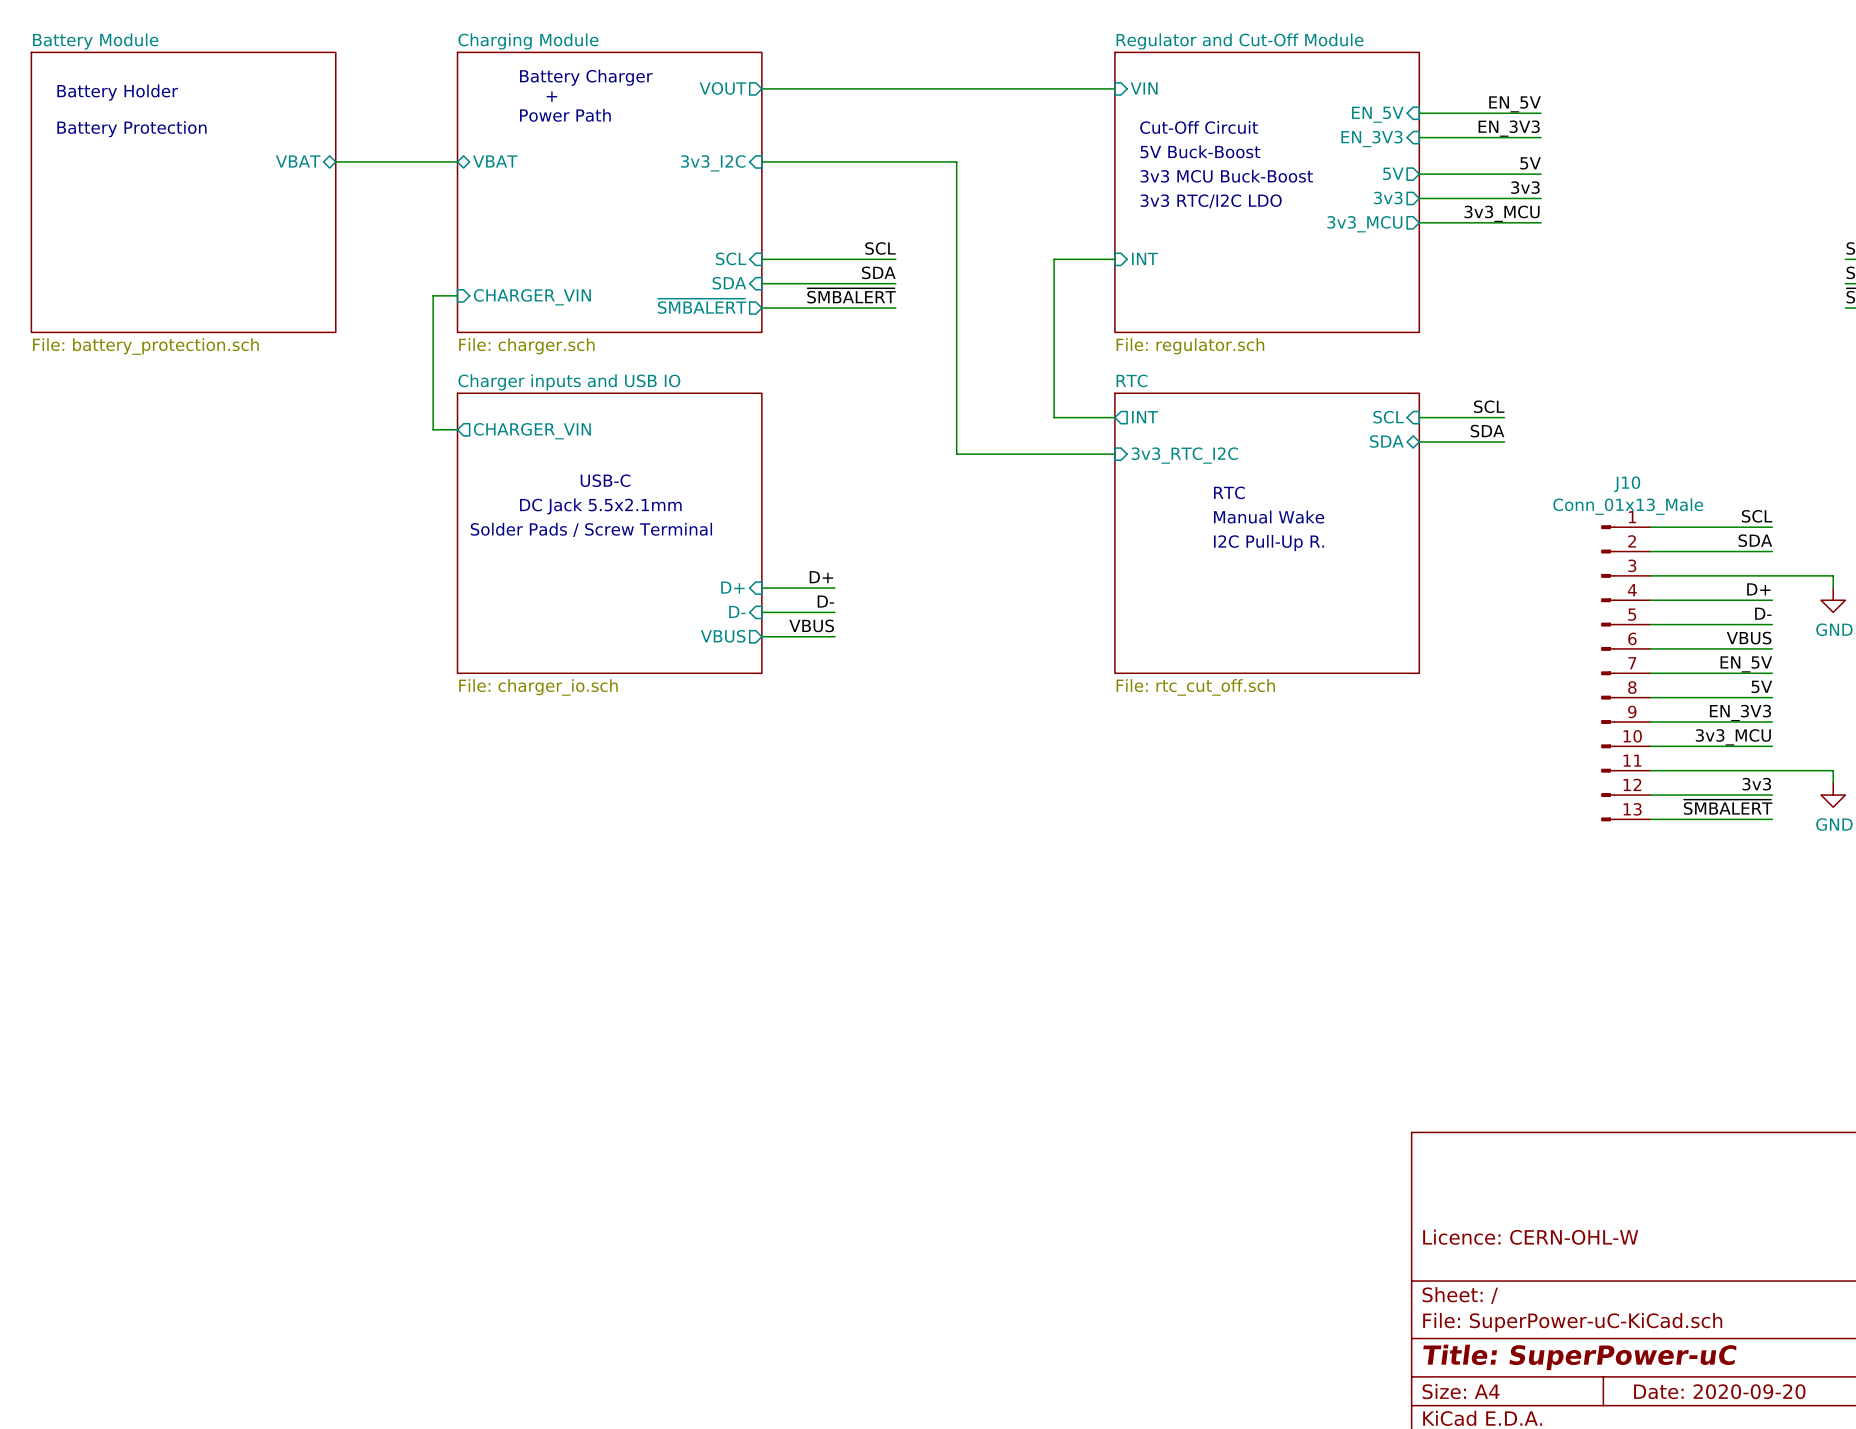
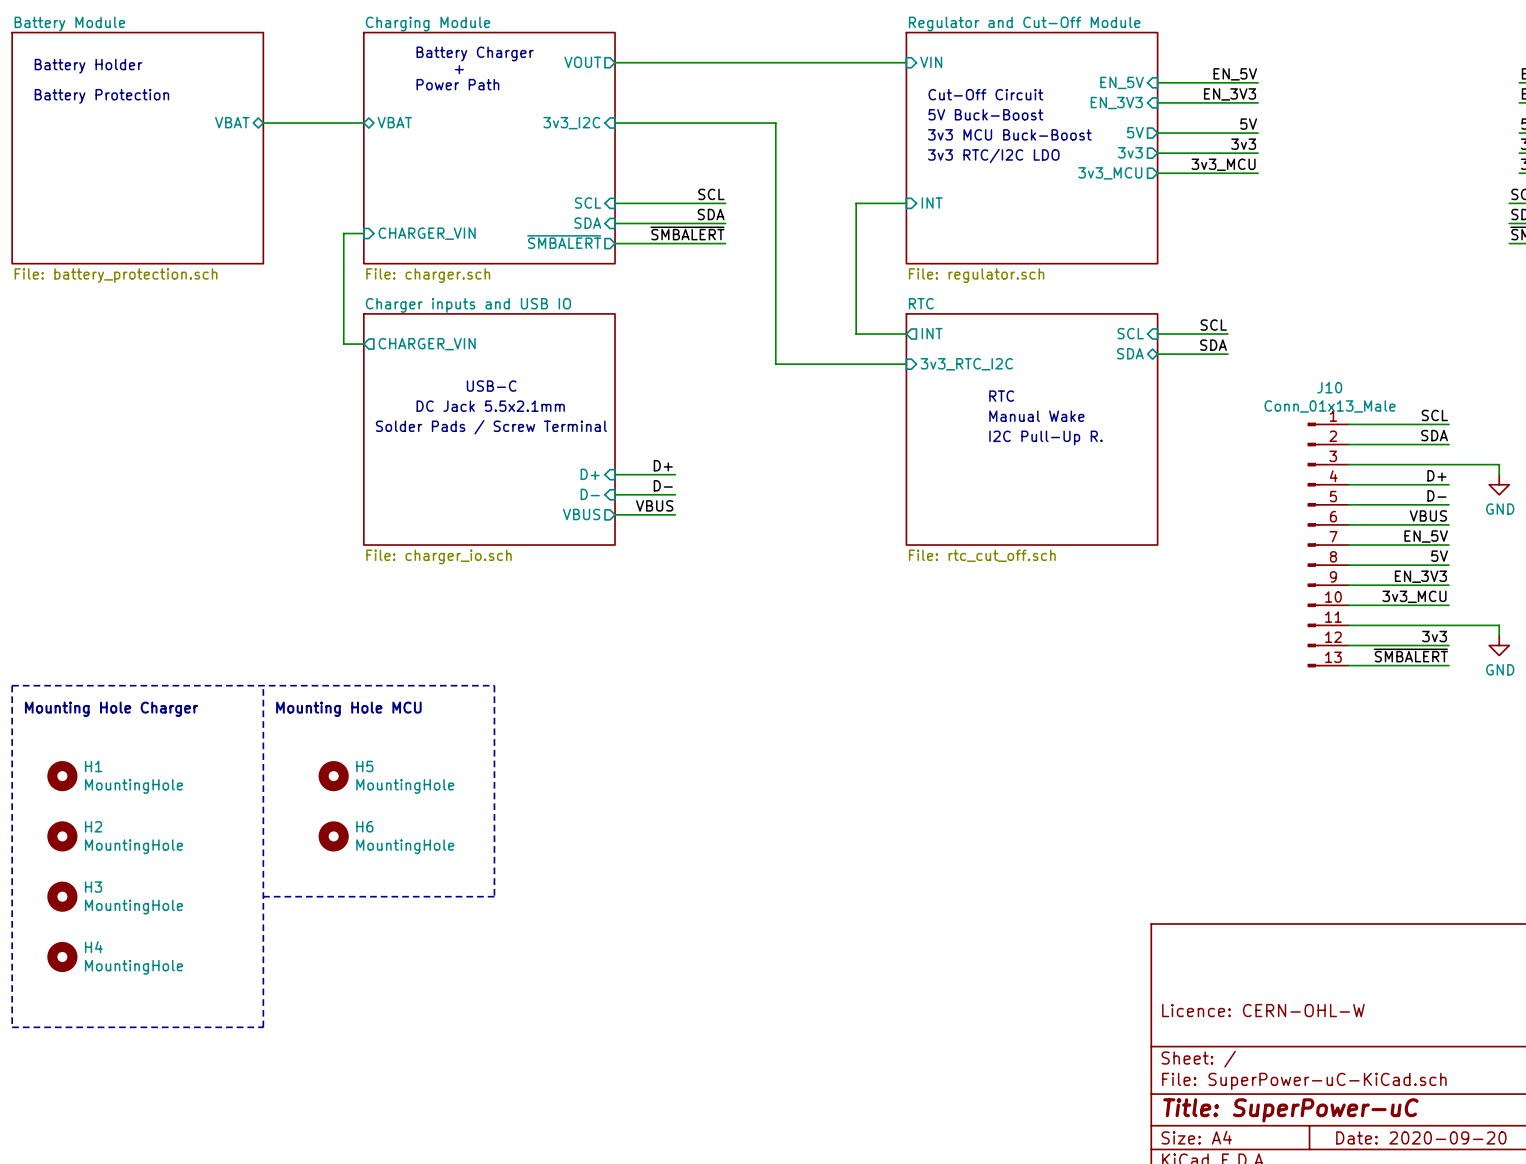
line: none -> (263, 685) (263, 1027) (12, 1027) (12, 685) (494, 685) (494, 896) (263, 896)
text: none -> Mounting Hole Charger (111, 709)
text: none -> Mounting Hole MCU (348, 709)
H1: none -> MountingHole (62, 776)
H5: none -> MountingHole (333, 776)
H2: none -> MountingHole (62, 836)
H6: none -> MountingHole (333, 836)
H3: none -> MountingHole (62, 896)
H4: none -> MountingHole (62, 956)

